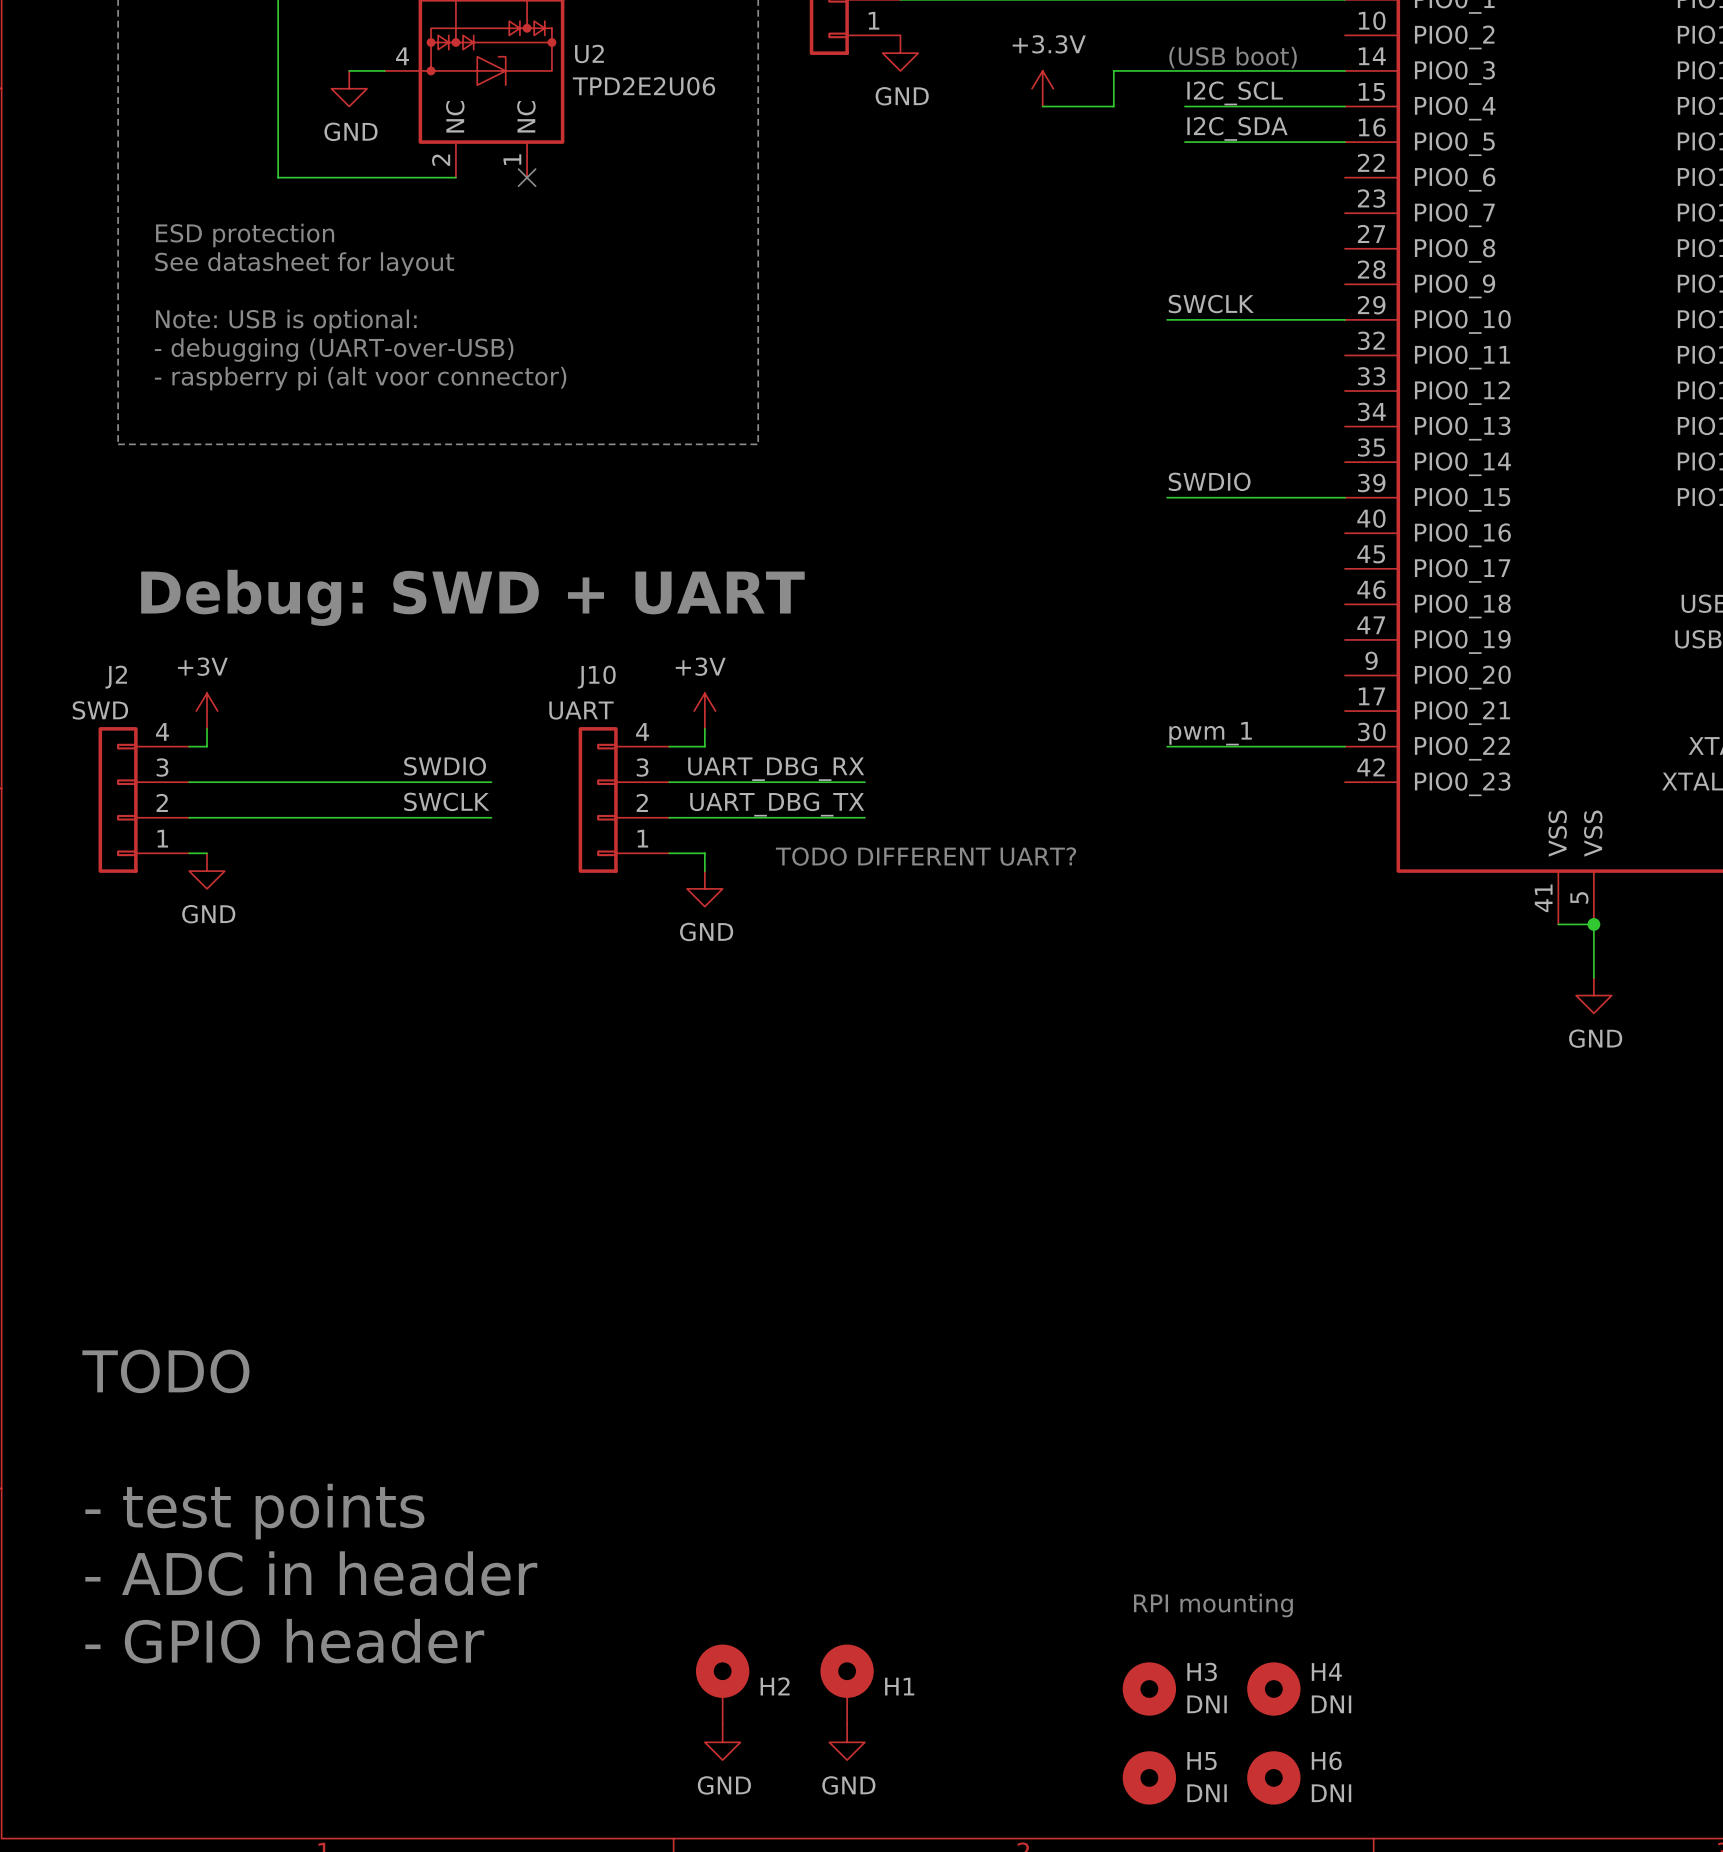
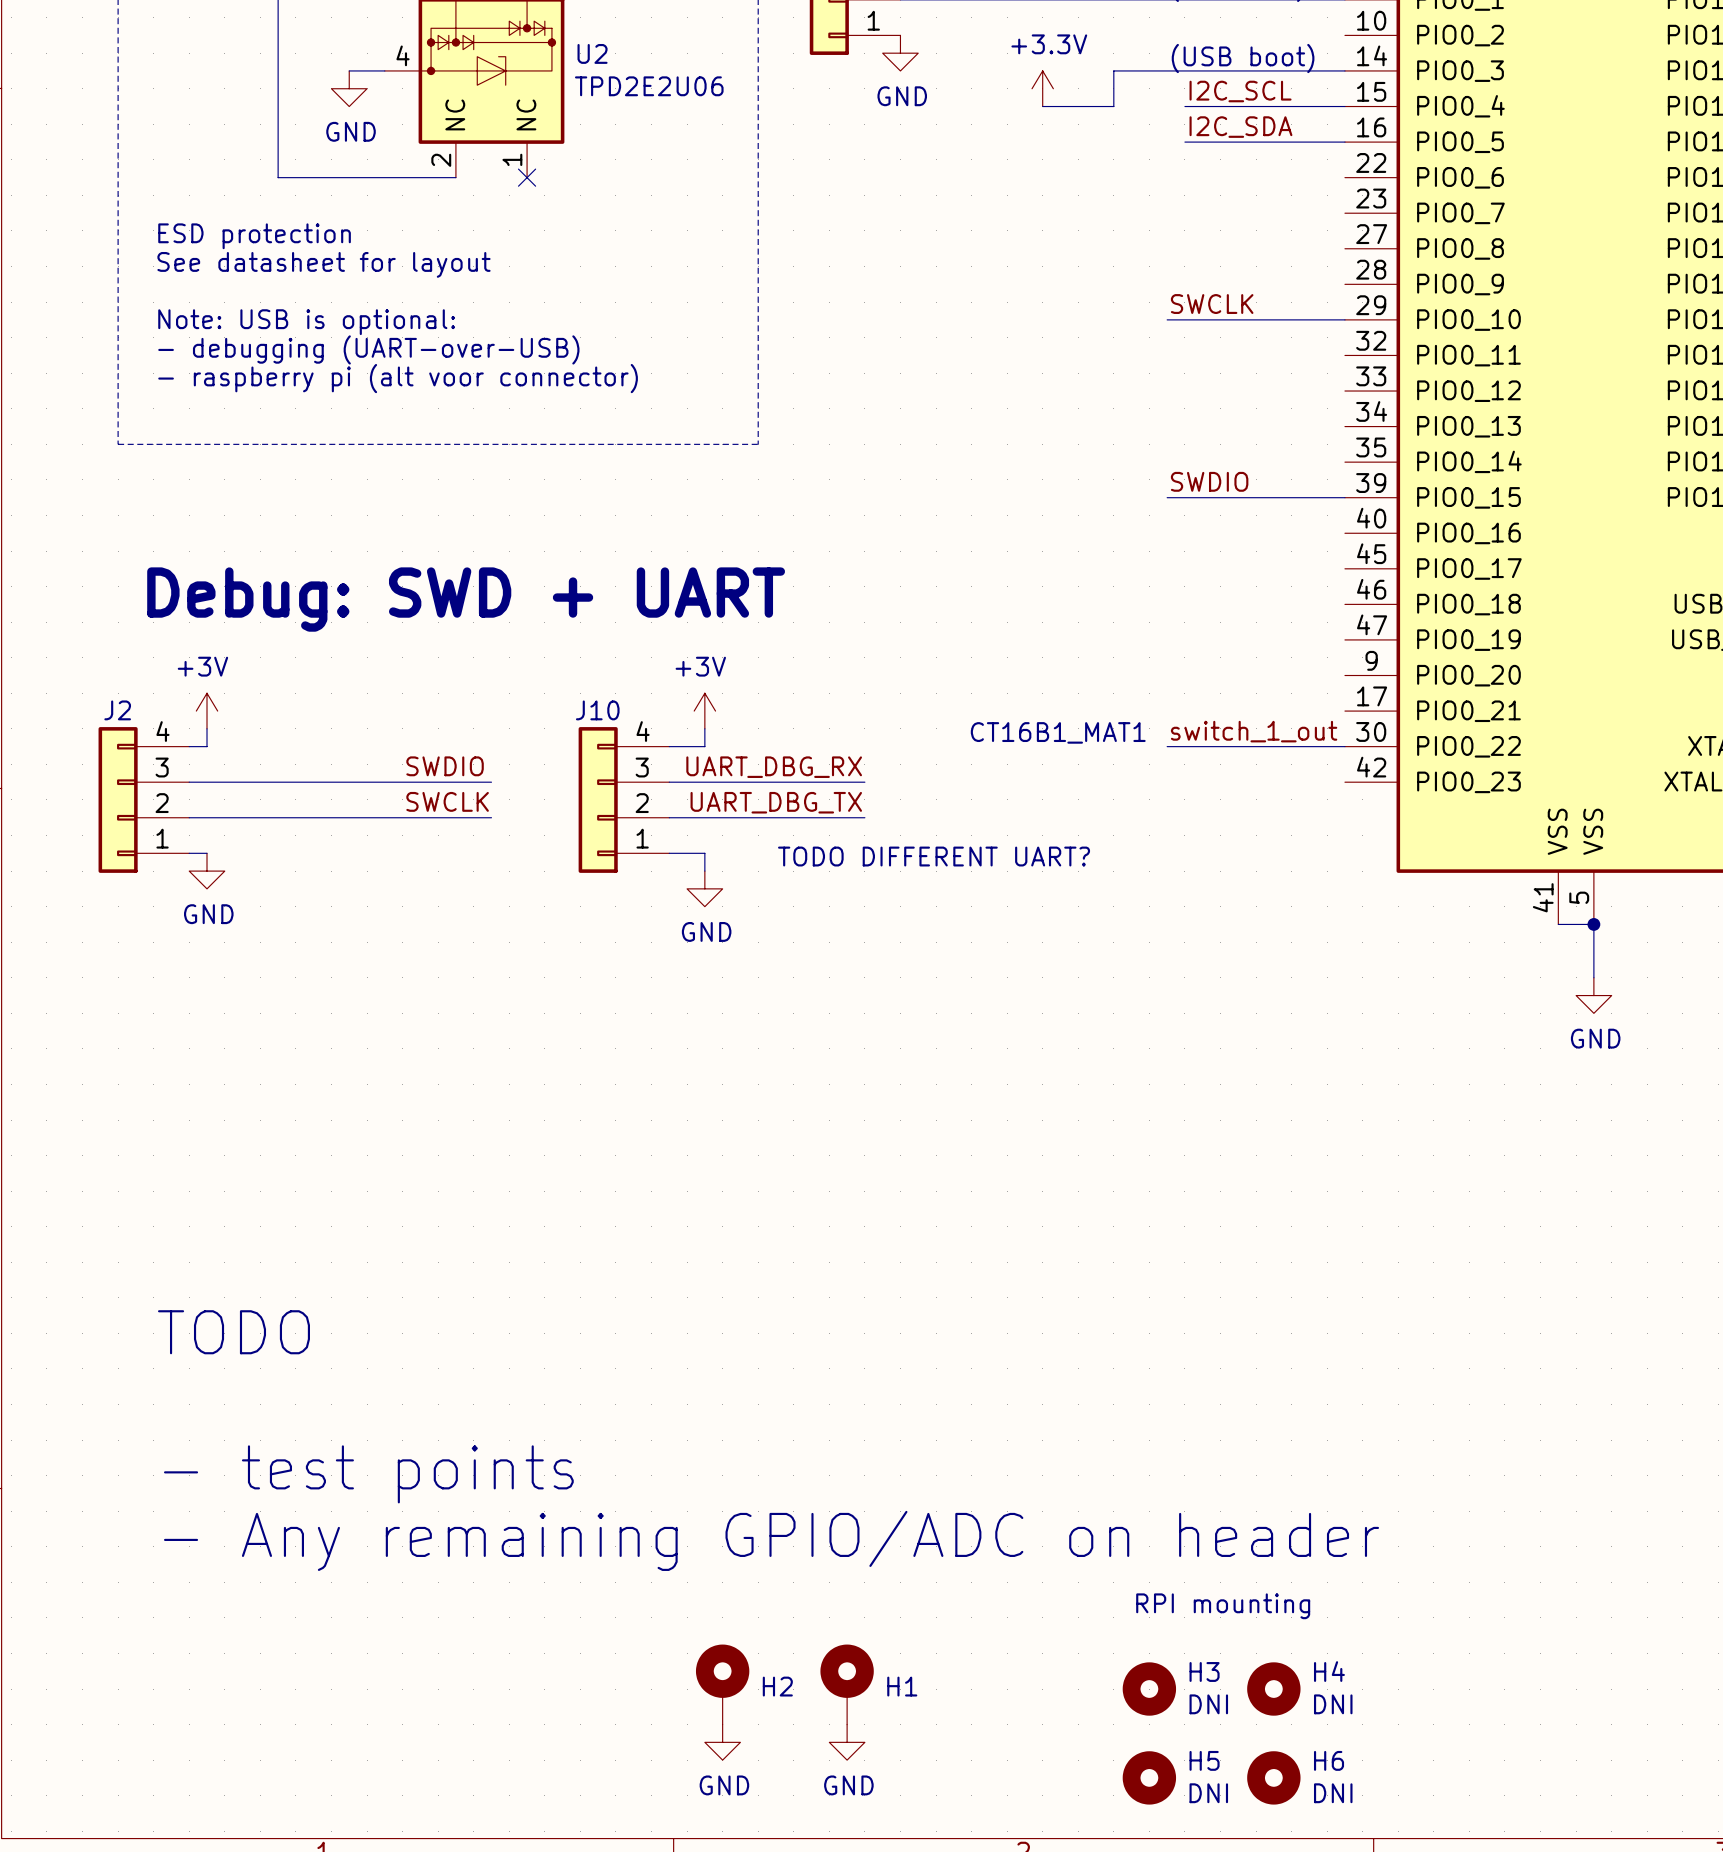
J2 name position: J2 (116, 677) -> J2 (117, 710)
J10 name position: J10 (596, 677) -> J10 (597, 710)
J2 value: SWD (100, 710) -> none
J10 value: UART (581, 710) -> none
label: pwm_1 (1210, 733) -> switch_1_out (1254, 731)
text: none -> CT16B1_MAT1 (1058, 732)
text position: TODO (165, 1371) -> TODO (233, 1332)
text position: - test points (254, 1511) -> - test points (368, 1474)
text: none -> - Any remaining GPIO/ADC on header (771, 1540)
text: - ADC in header (311, 1573) -> none
text: - GPIO header (284, 1641) -> none

